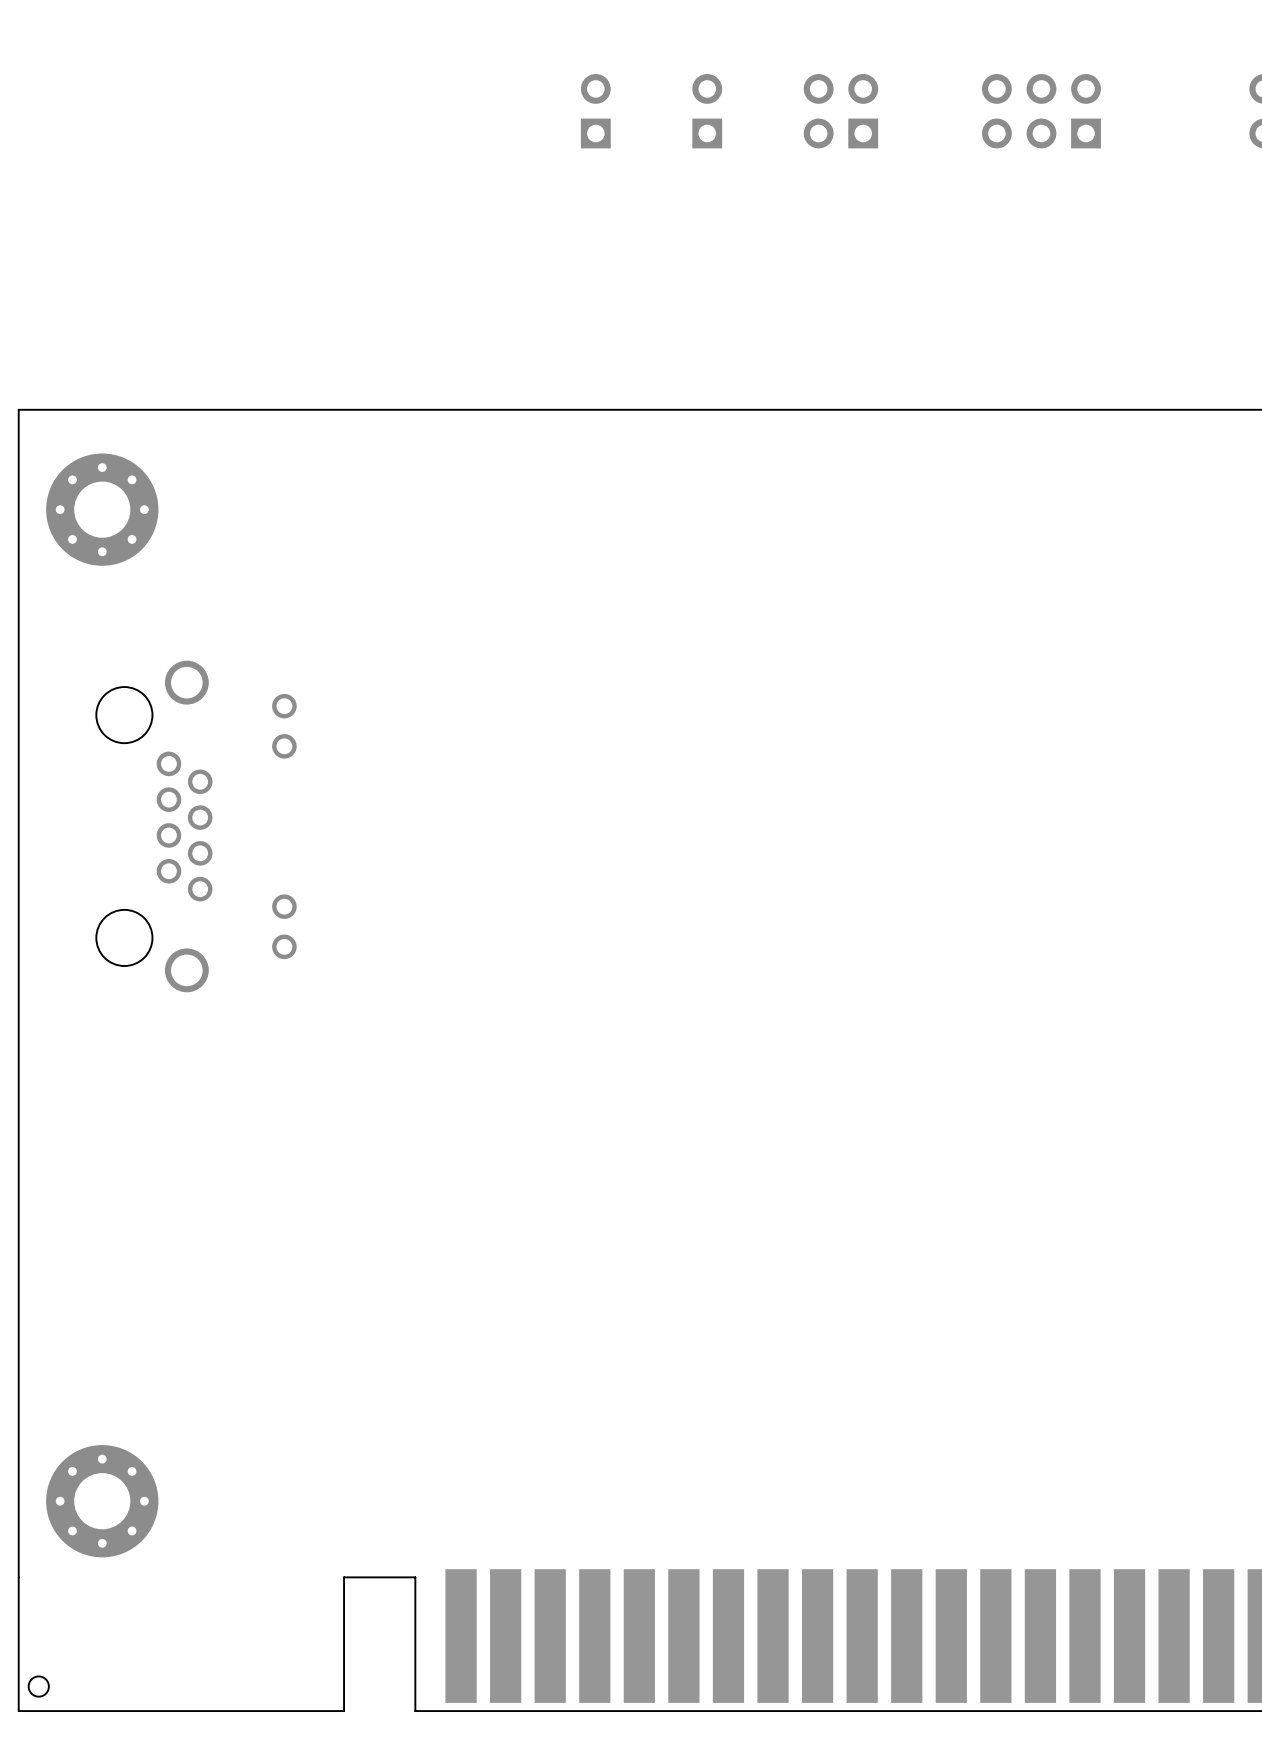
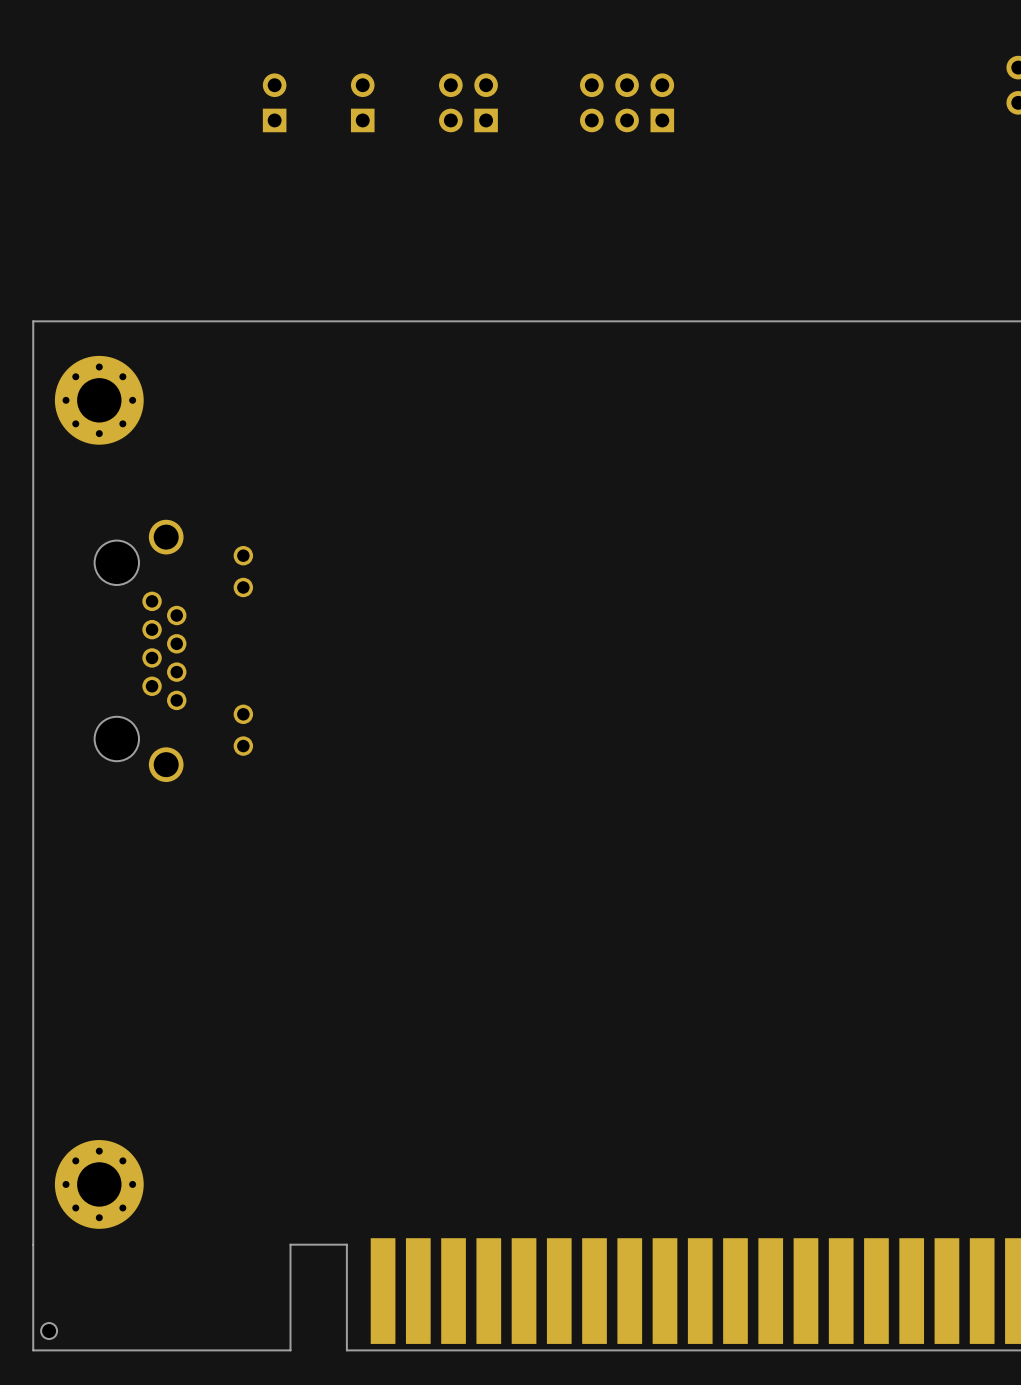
part: (595, 111) -> none
part: (707, 111) -> none
part position: (840, 111) -> (468, 102)
part position: (1041, 111) -> (627, 102)
part: none -> (274, 102)
part: none -> (362, 102)

